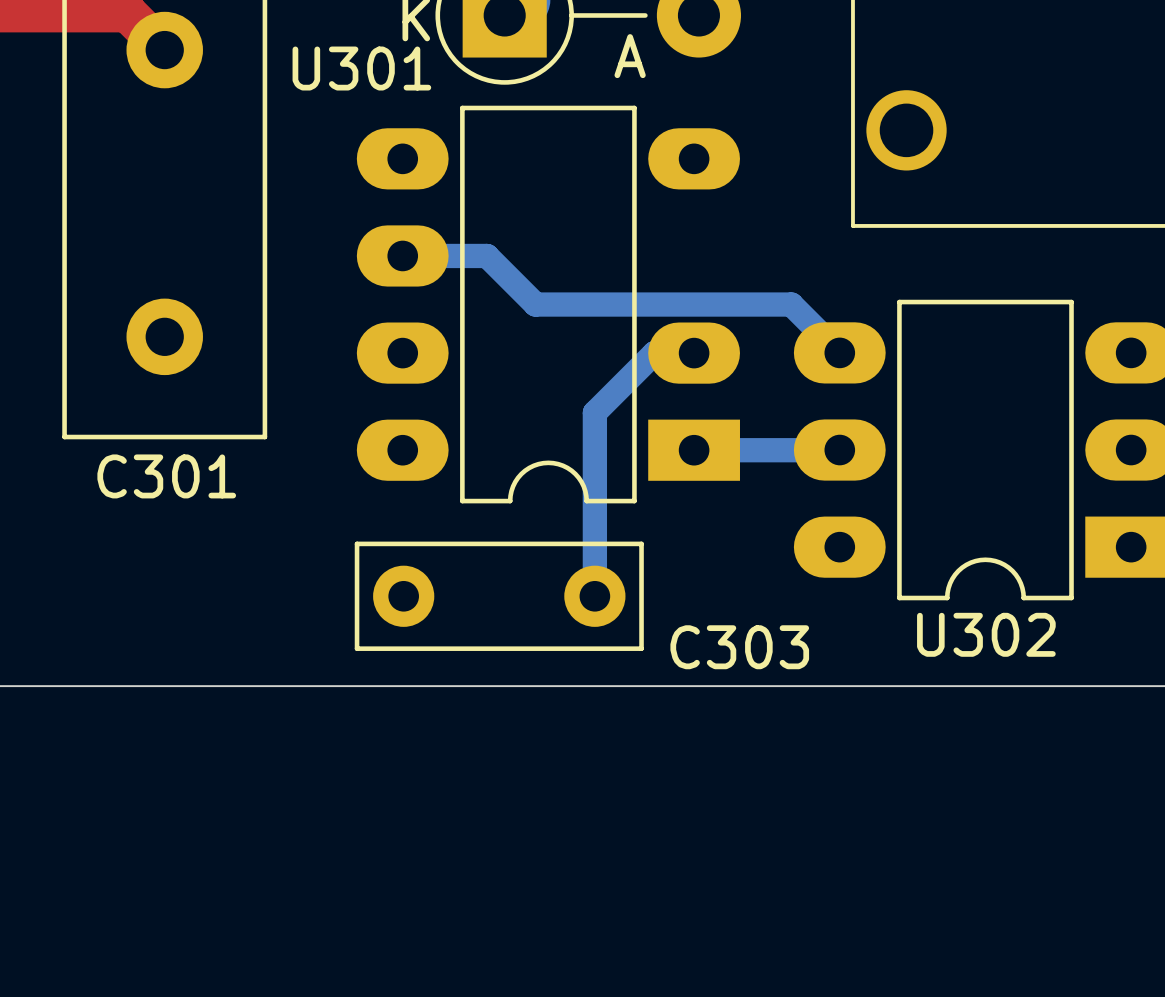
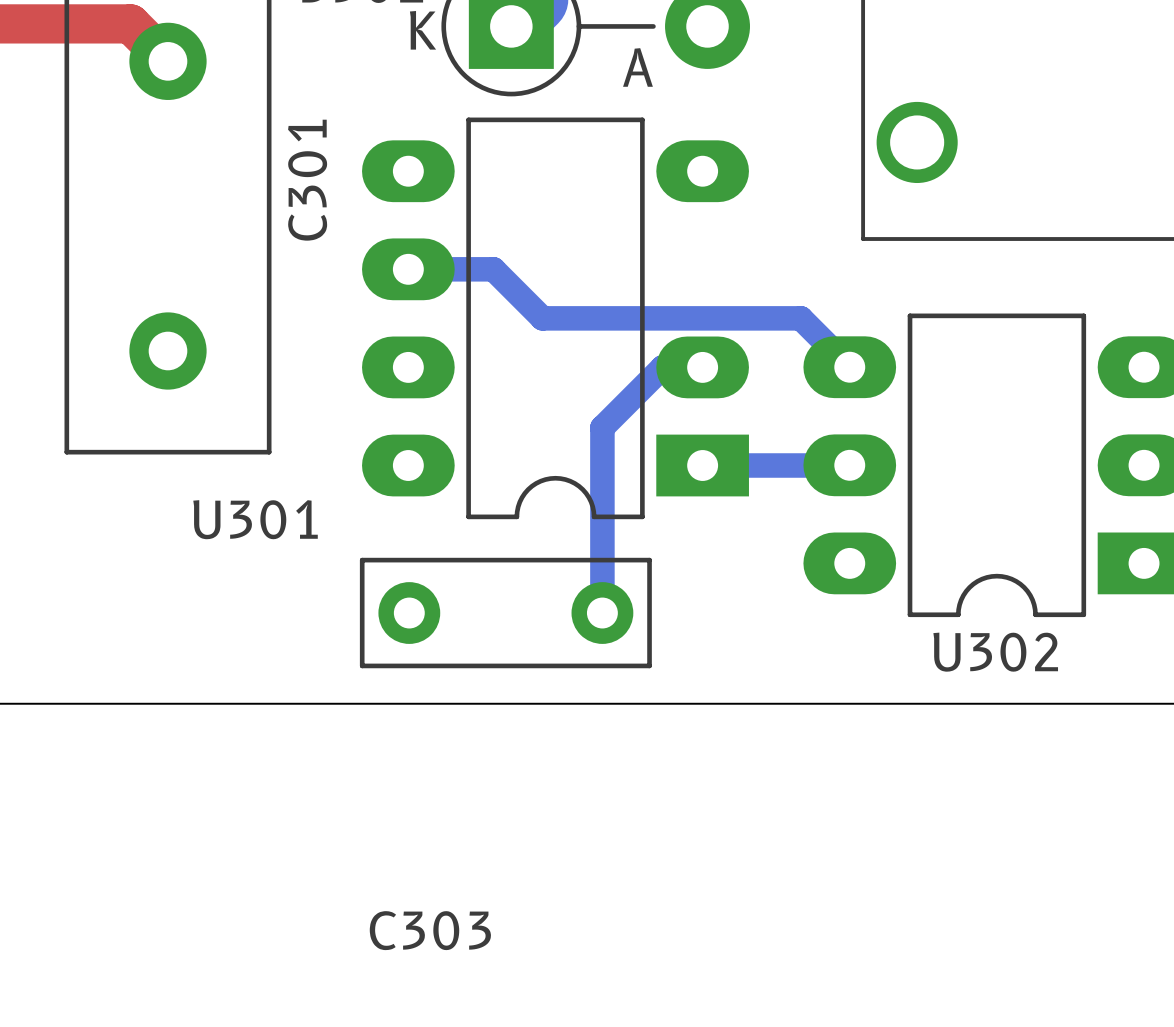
U301 name position: U301 (361, 68) -> U301 (255, 519)
C301 name rotation: 0° (166, 476) -> 90° counterclockwise (307, 180)
C301 name position: C301 (166, 476) -> C301 (307, 180)
C303 name position: C303 (739, 647) -> C303 (430, 930)

